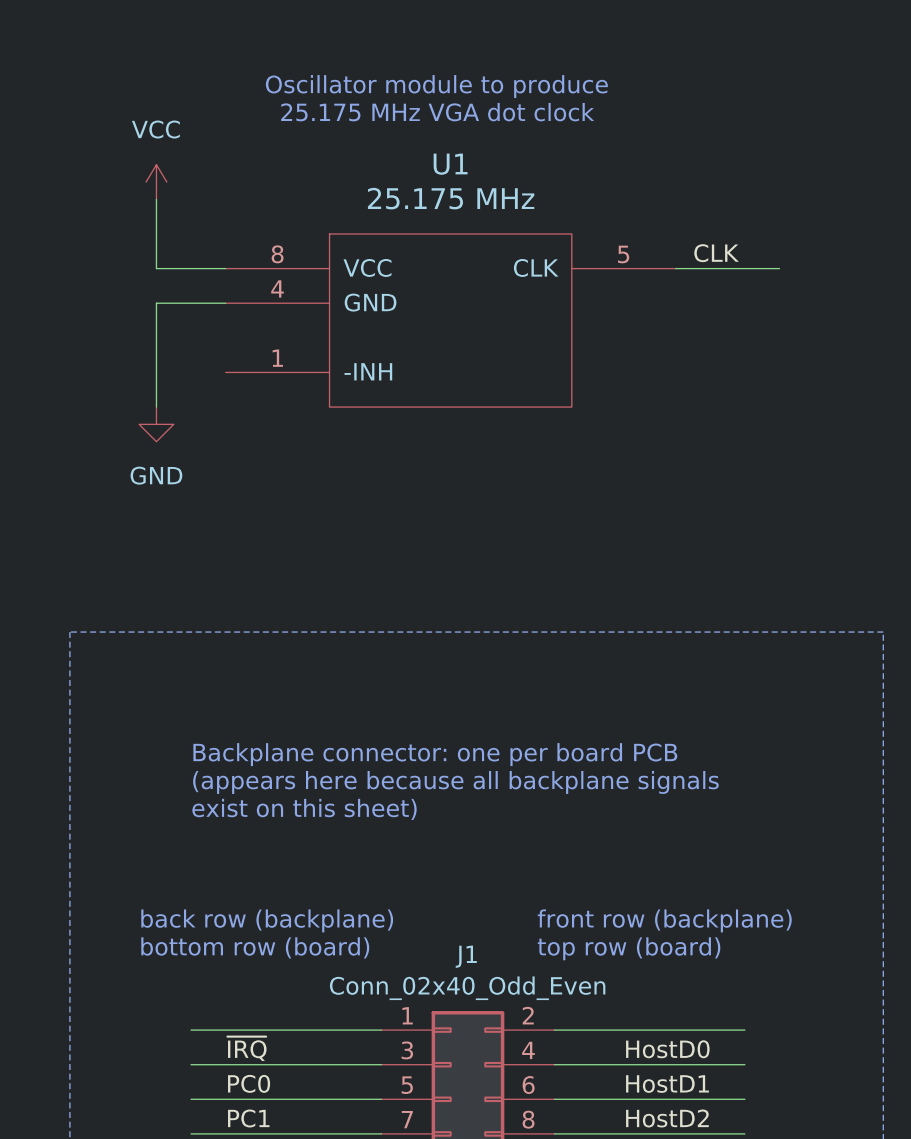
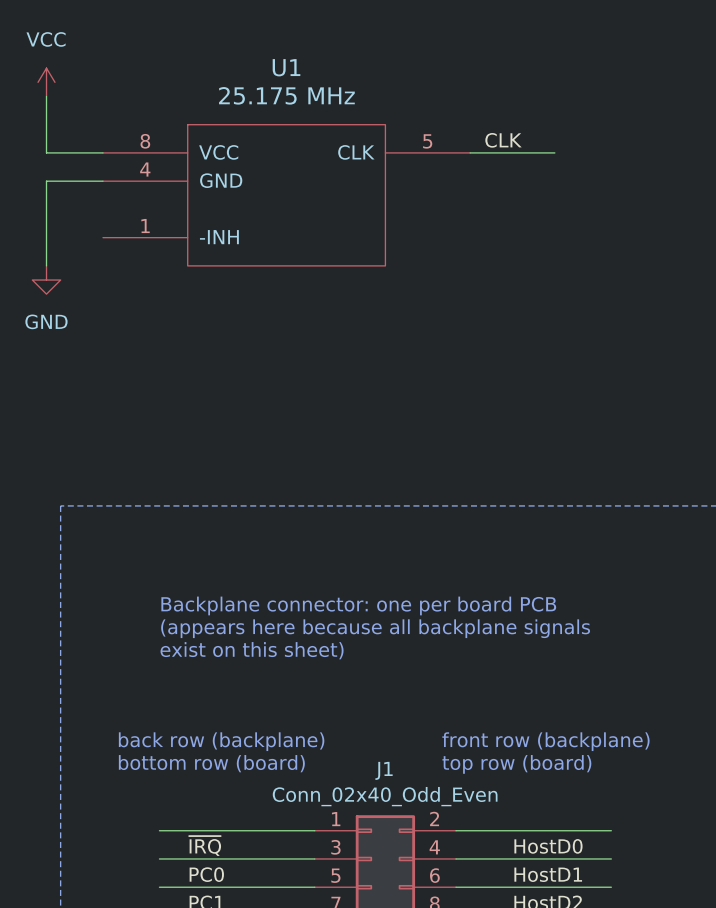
text: Oscillator module to produce (436, 86) -> none
text: 25.175 MHz VGA dot clock (437, 112) -> none
power symbol position: VCC (156, 182) -> VCC (46, 82)
wire: (156, 199) (156, 268) (225, 268) -> (46, 96) (46, 152) (102, 152)
label position: CLK (716, 253) -> CLK (503, 140)
wire: (675, 268) (779, 268) -> (470, 152) (554, 152)
wire: (225, 303) (156, 303) (156, 407) -> (102, 181) (46, 181) (46, 265)
U1 position: (450, 320) -> (286, 195)
power symbol position: GND (156, 424) -> GND (46, 280)

